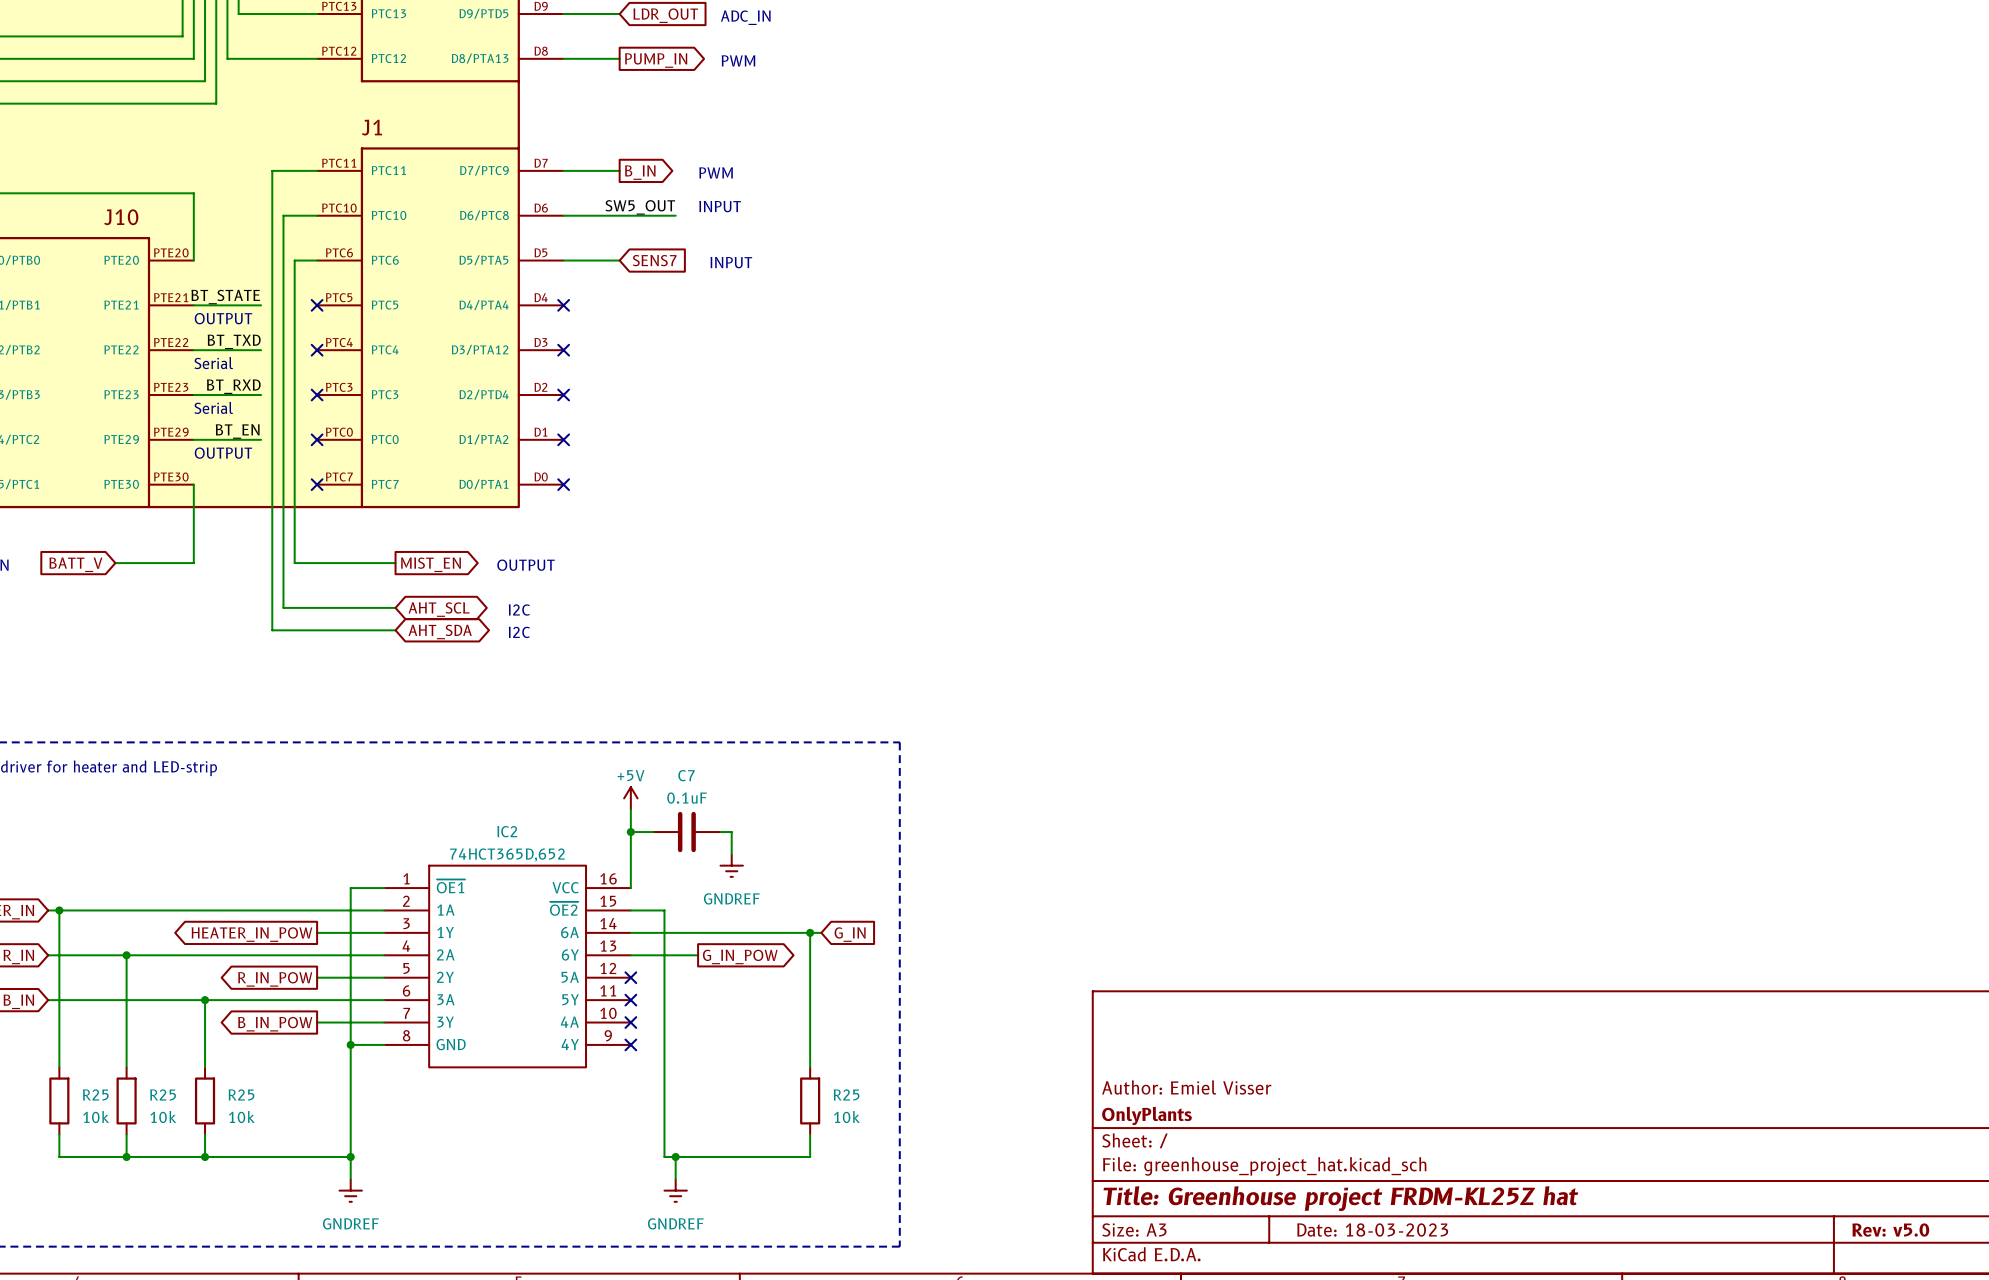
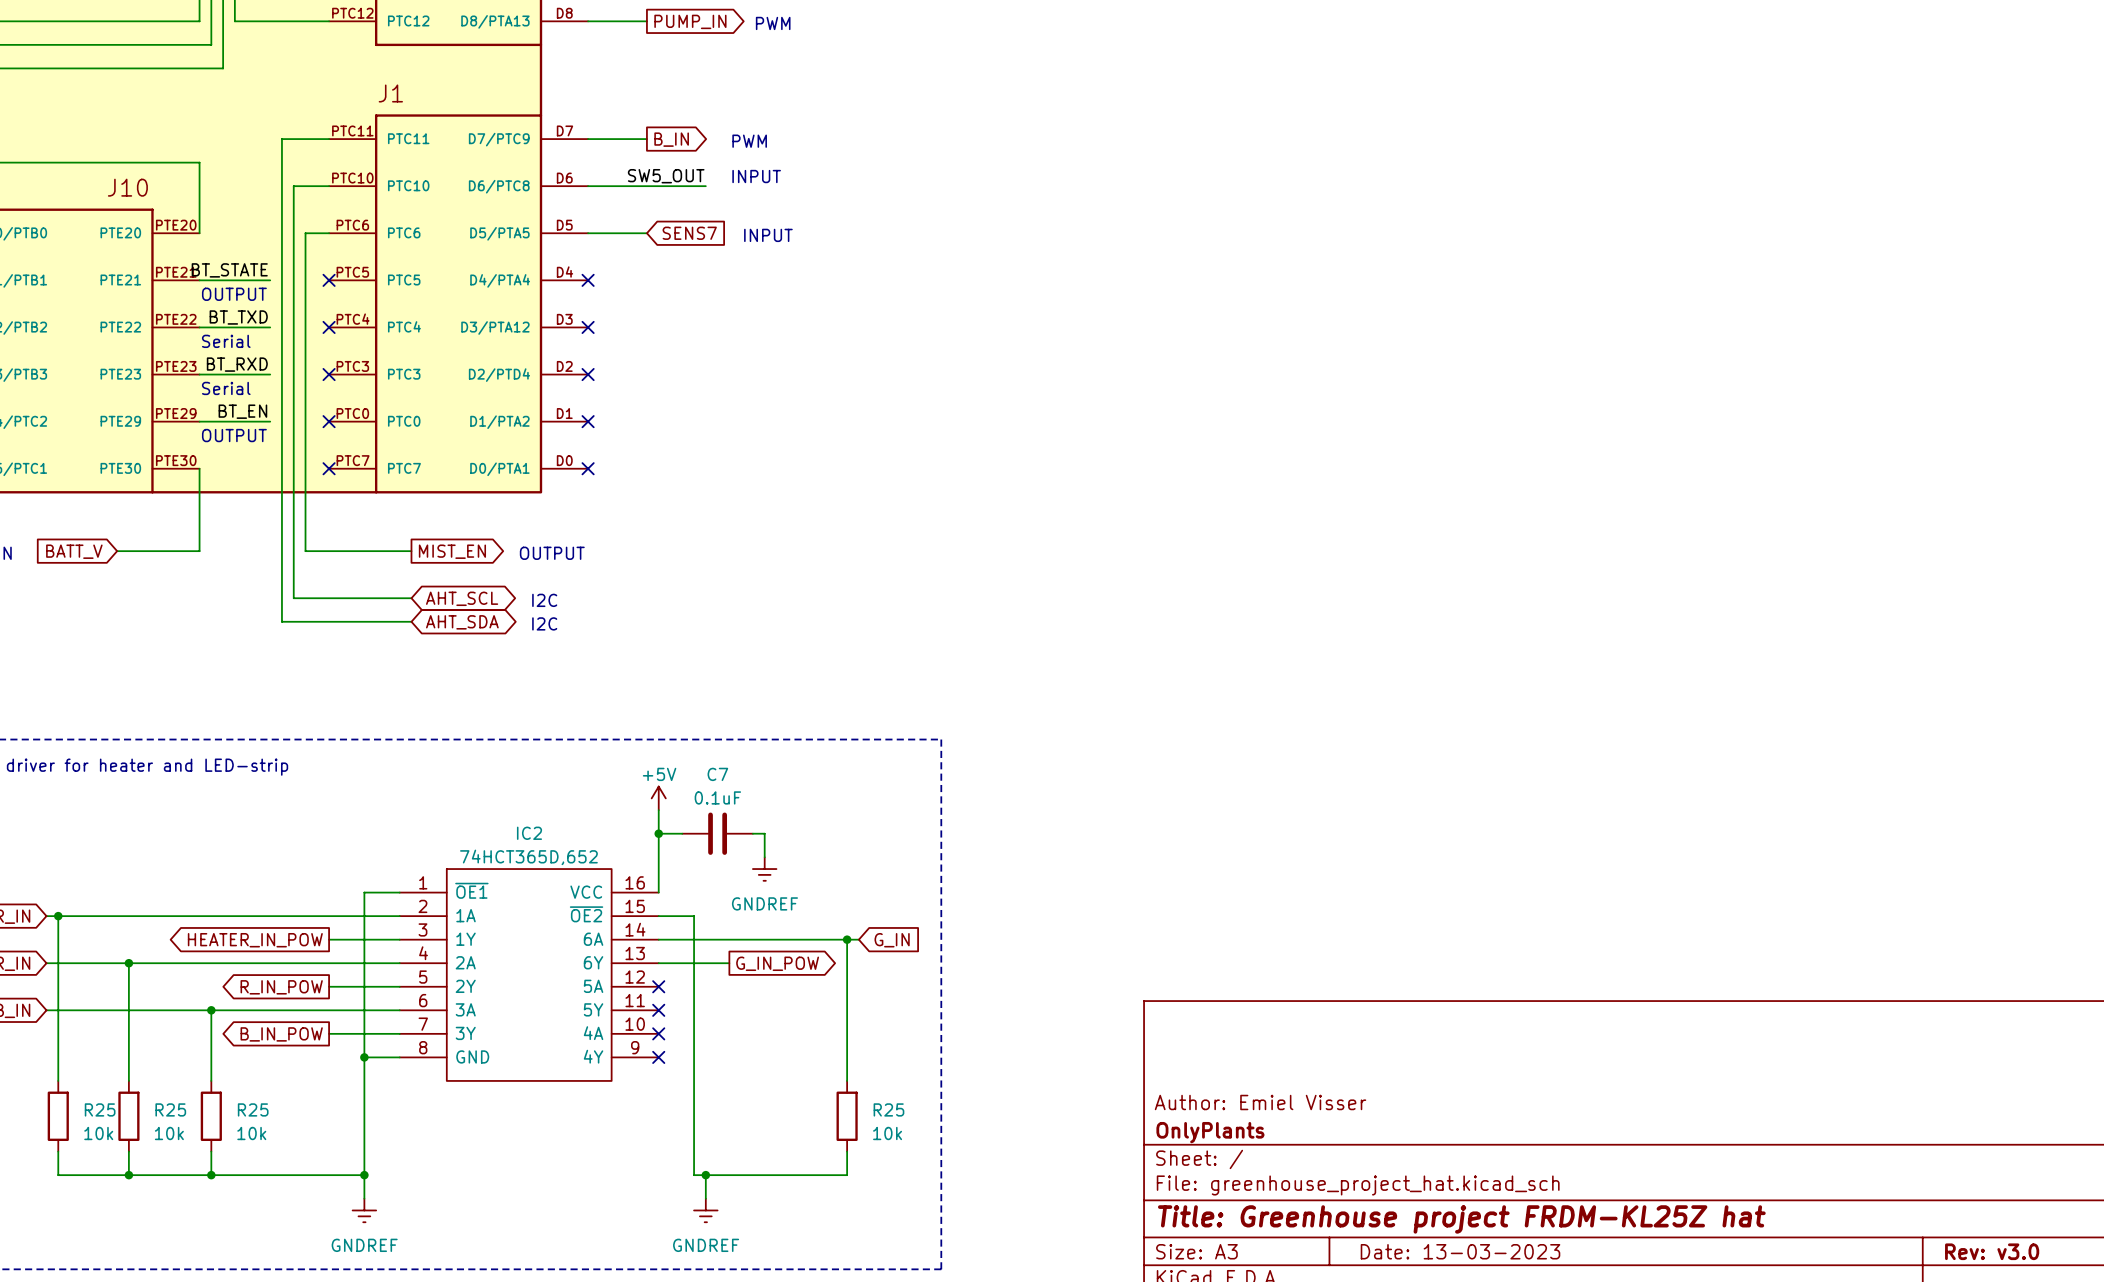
title block: Date: 18-03-2023 (1372, 1229) -> Date: 13-03-2023 (1460, 1251)
title block: Rev: v5.0 (1890, 1230) -> Rev: v3.0 (1992, 1251)

